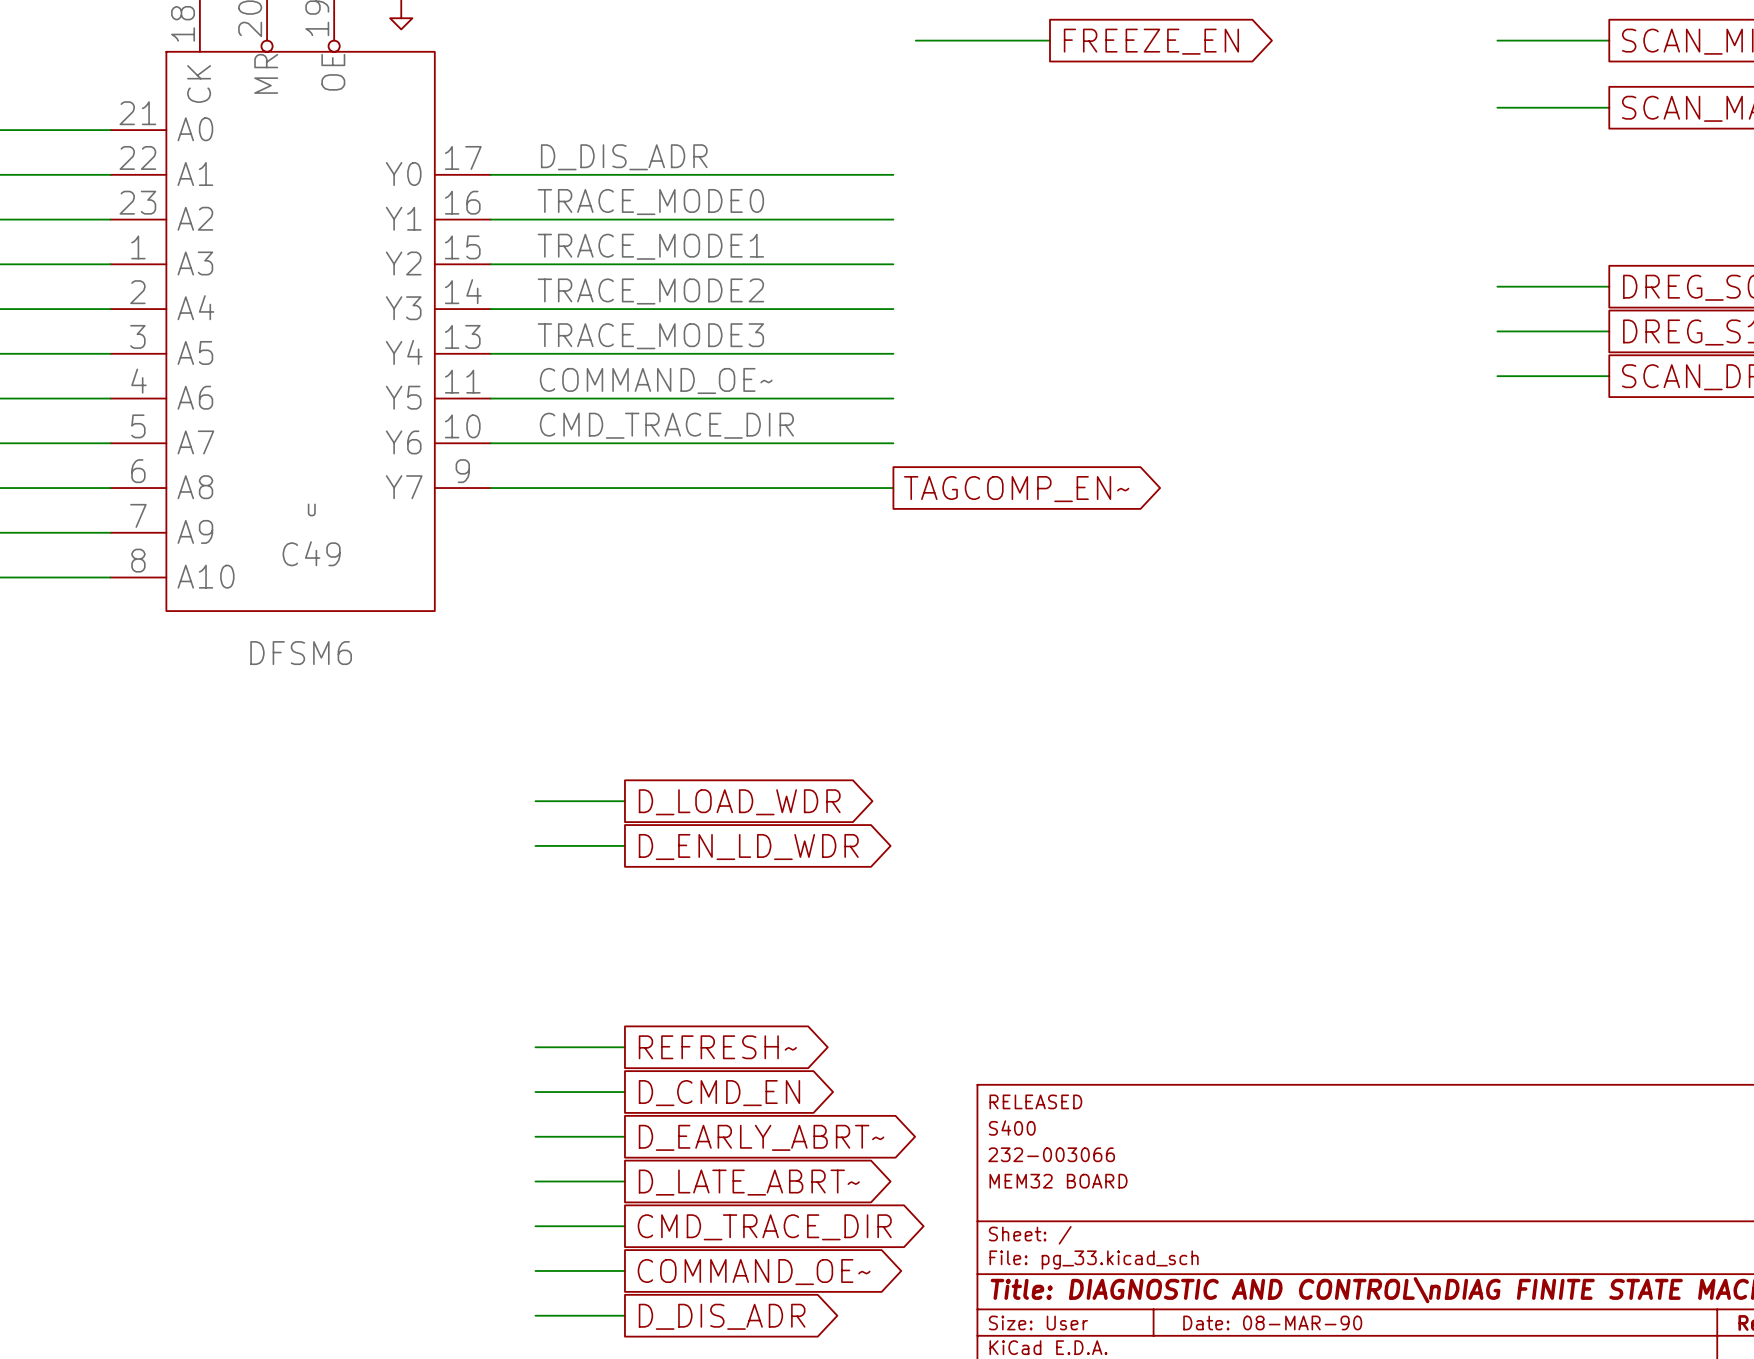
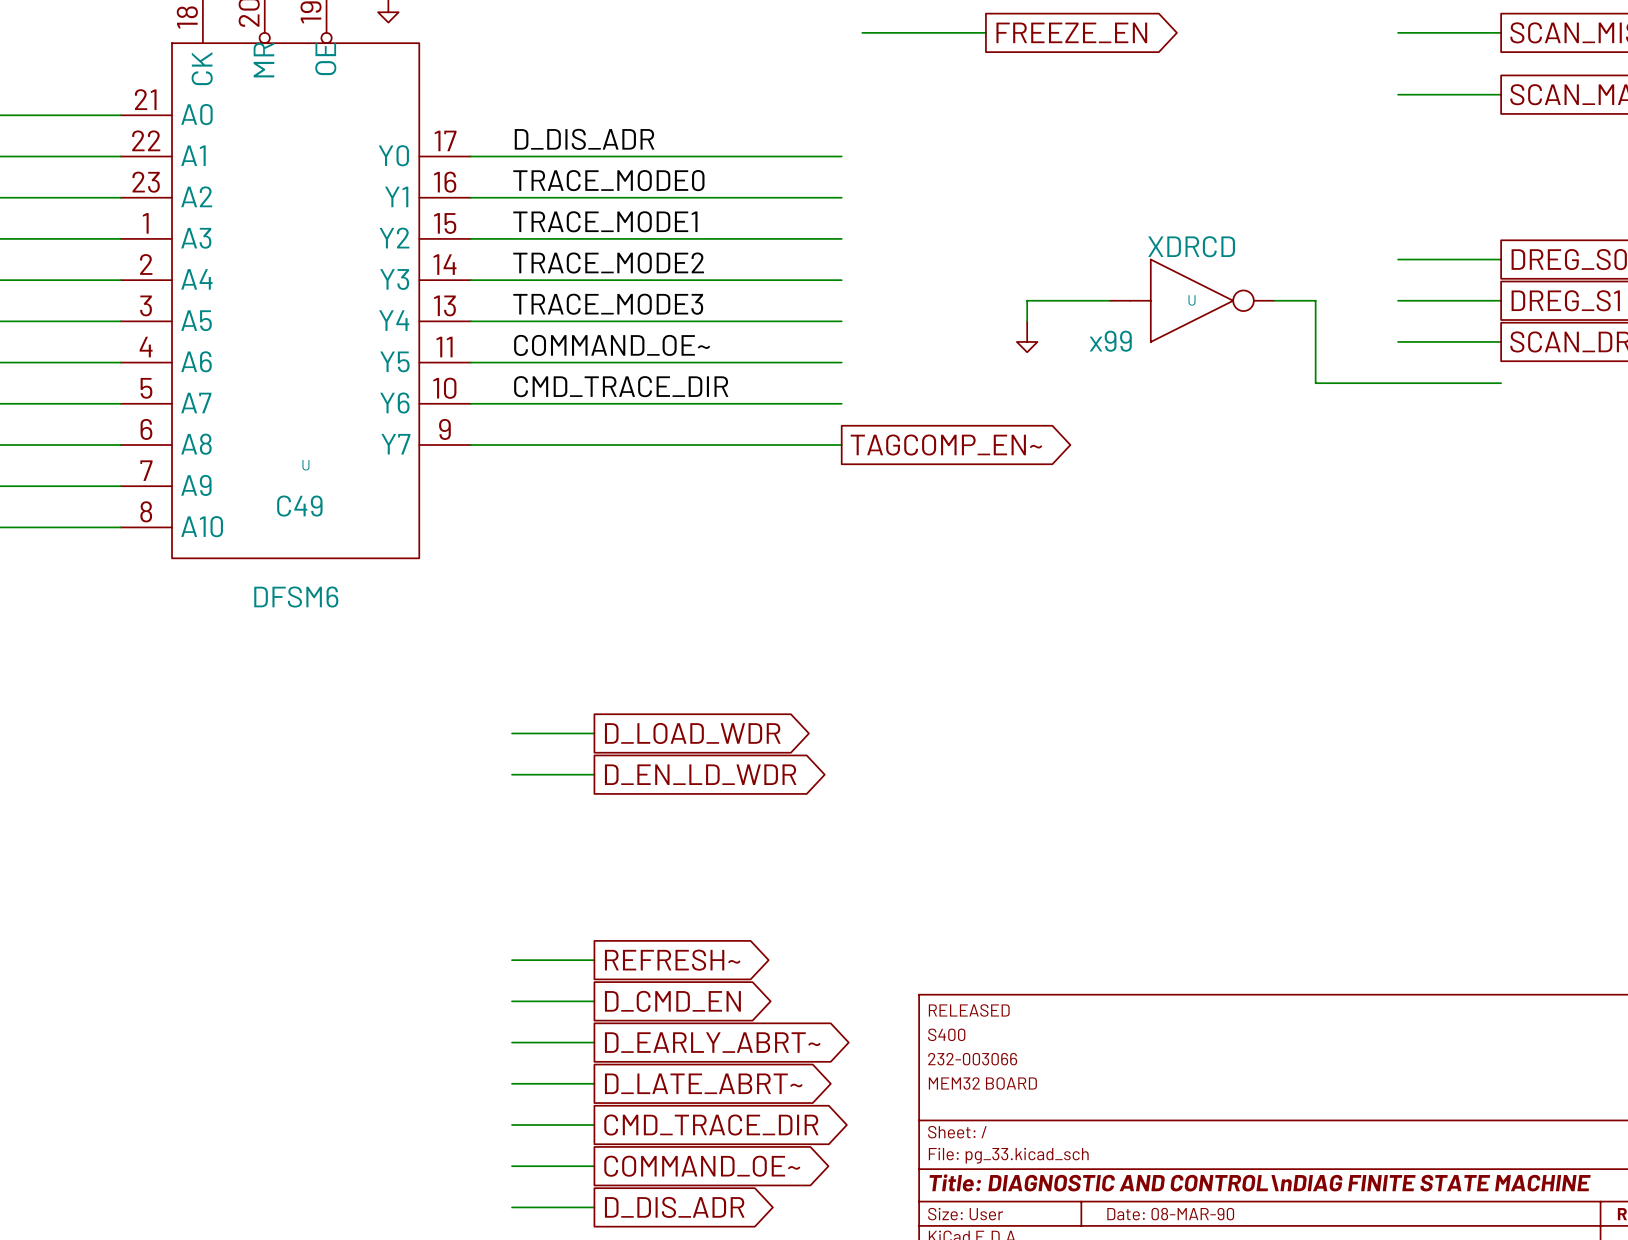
wire: none -> (1109, 300) (1027, 300) (1027, 321)
U: none -> (1192, 300)
wire: none -> (1274, 300) (1315, 300) (1315, 383) (1501, 383)
power symbol: none -> (1027, 337)

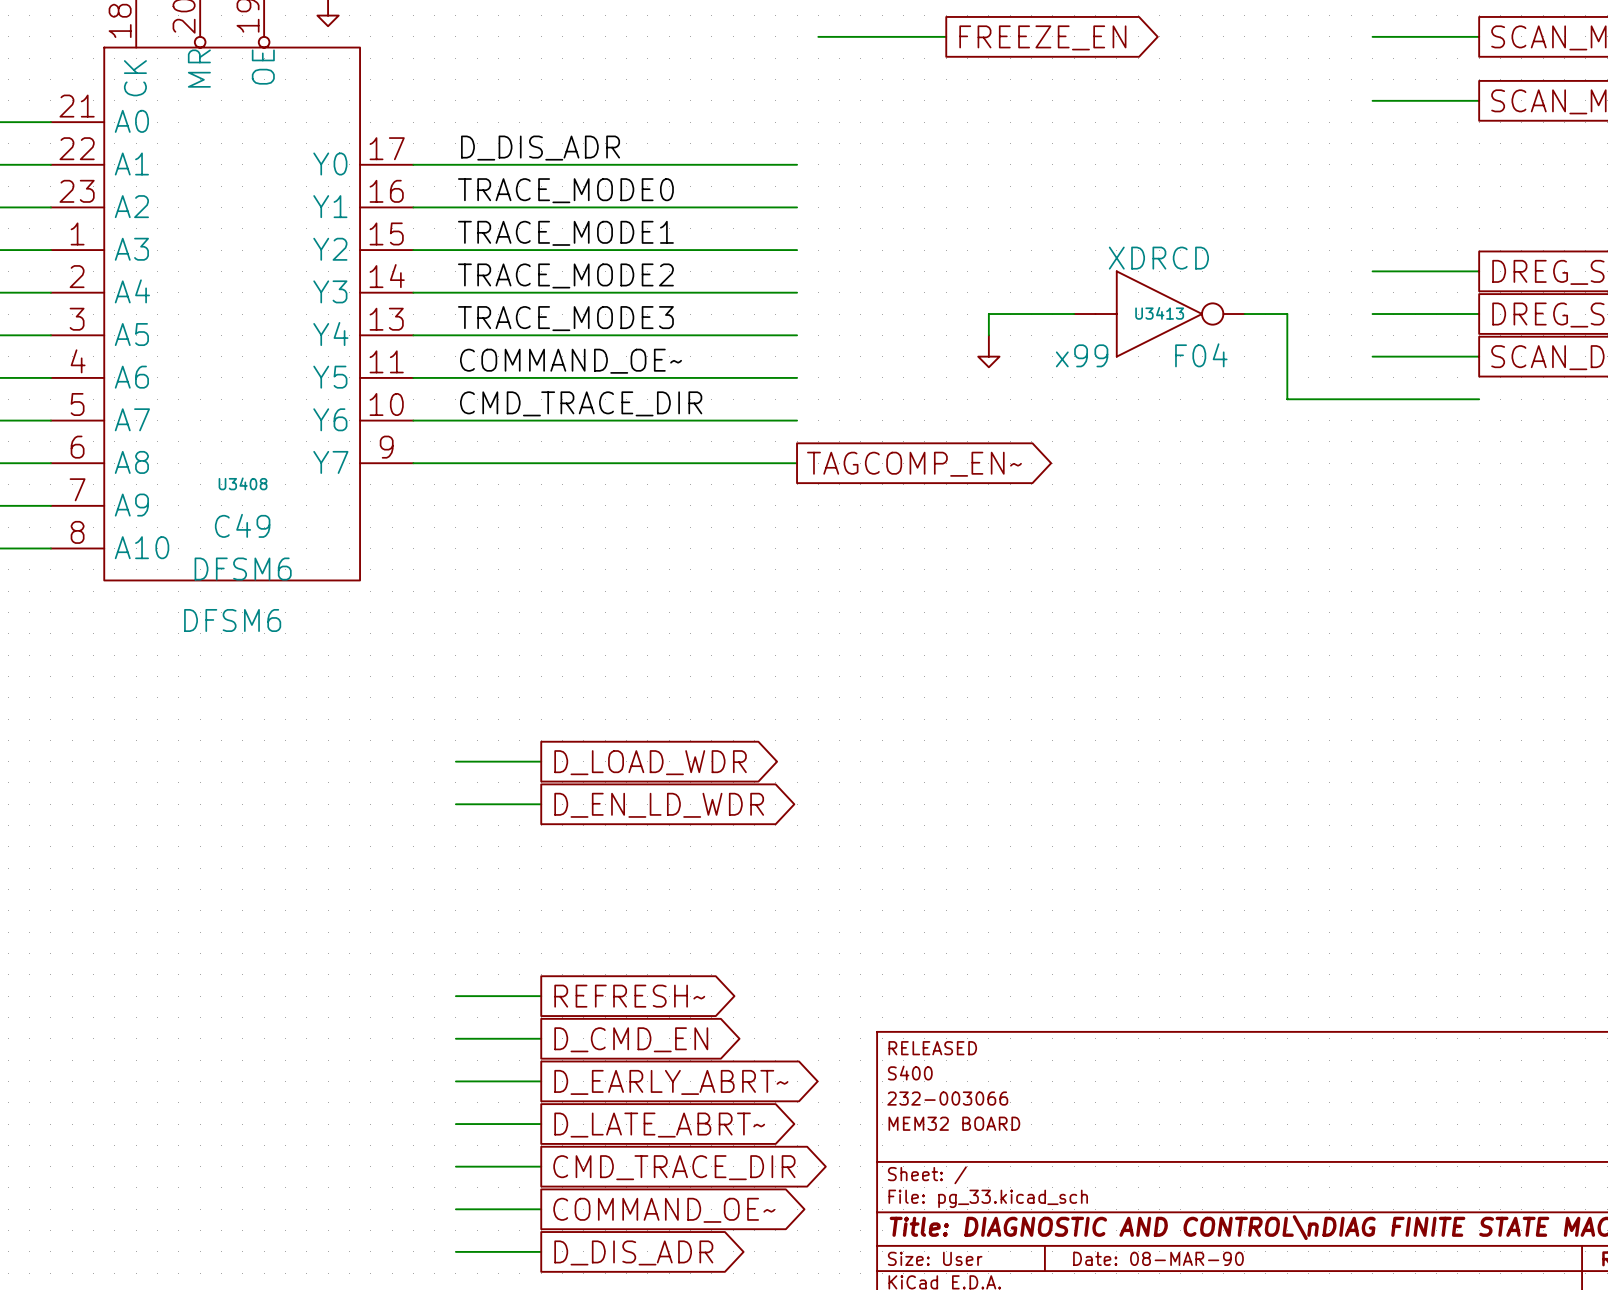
U name: U (1192, 300) -> U3413 (1159, 313)
U value: none -> F04 (1201, 355)
U name: U (305, 465) -> U3408 (243, 483)
U value: none -> DFSM6 (243, 569)

